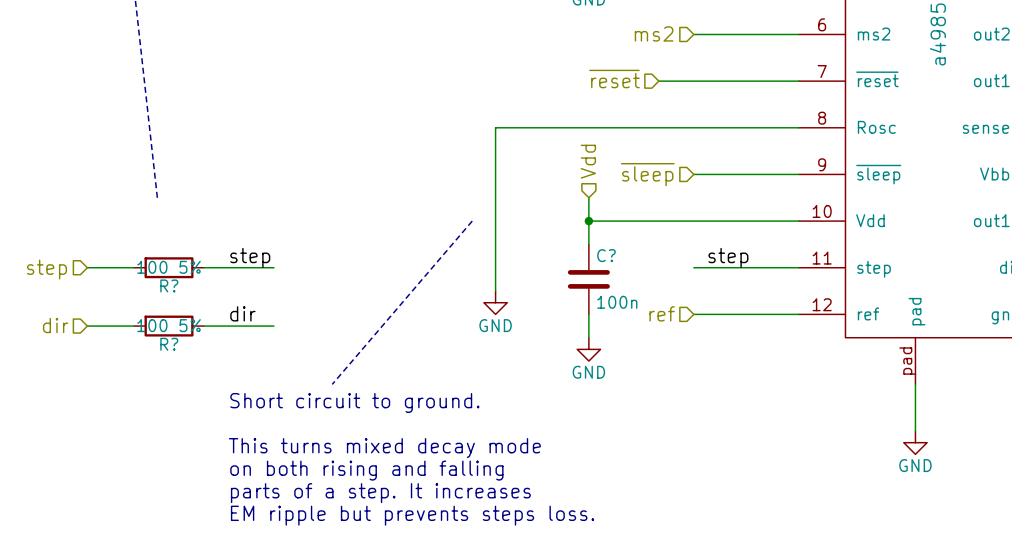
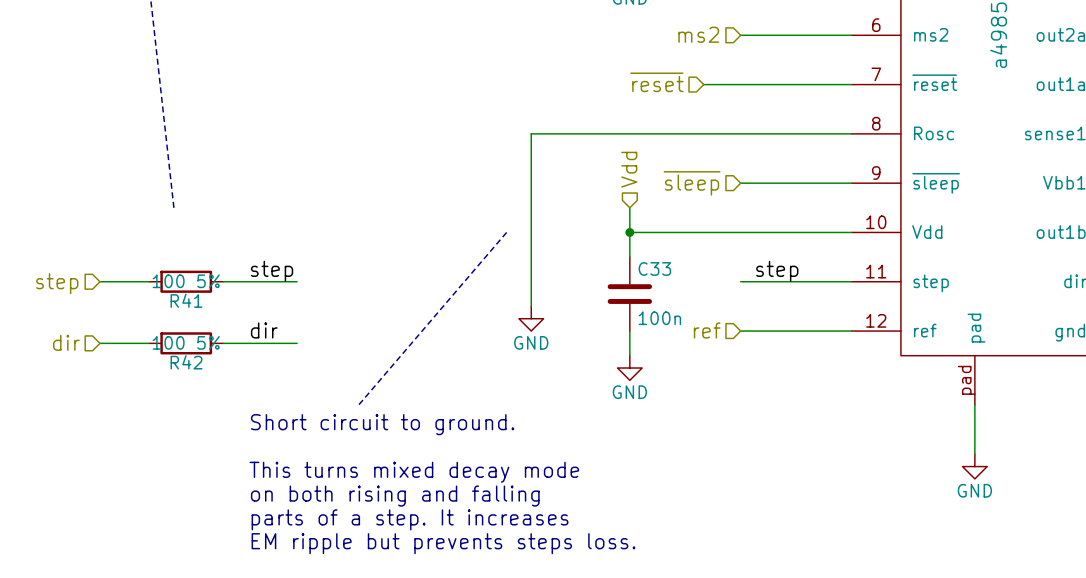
C? name: C? (606, 255) -> C33 (654, 268)
R? name: R? (169, 285) -> R41 (186, 300)
R? name: R? (169, 344) -> R42 (186, 362)

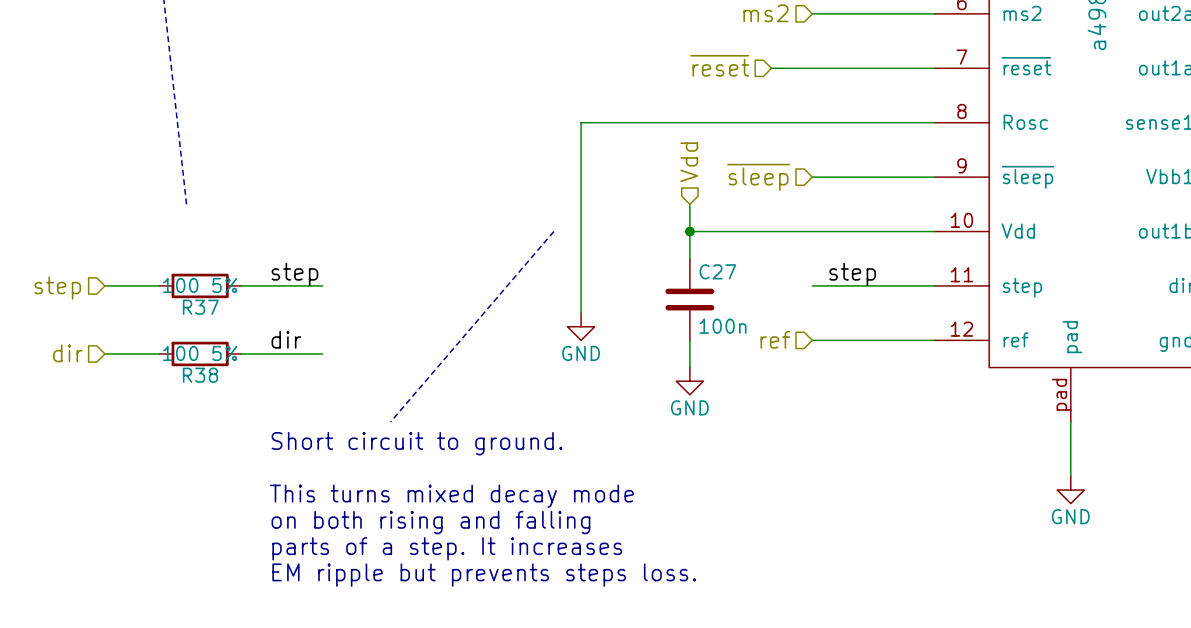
C33 name: C33 (654, 268) -> C27 (717, 271)
R41 name: R41 (186, 300) -> R37 (200, 307)
R42 name: R42 (186, 362) -> R38 (200, 375)

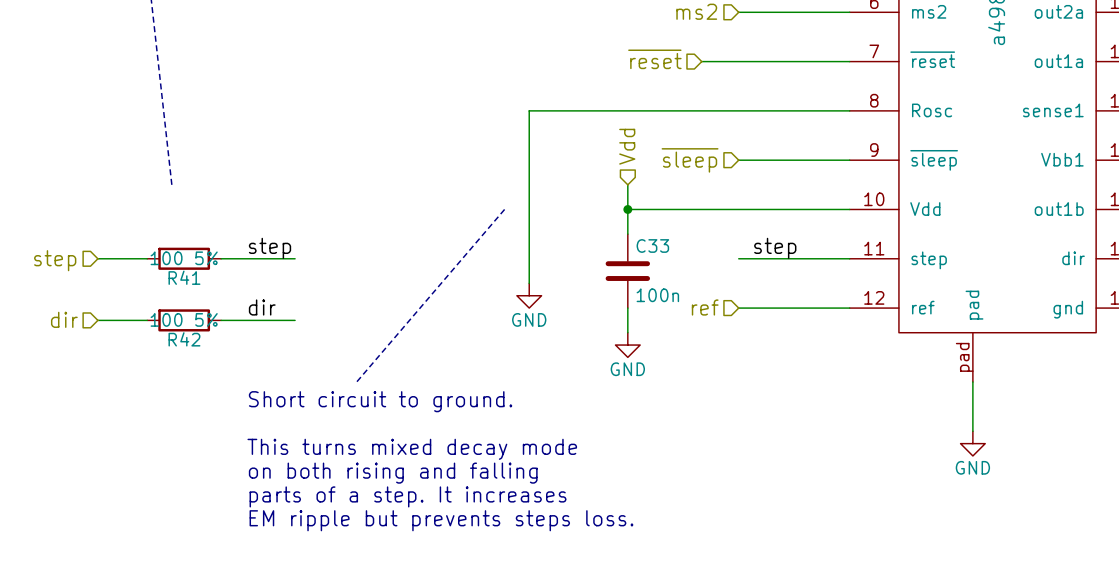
C27 name: C27 (717, 271) -> C33 (652, 245)
R37 name: R37 (200, 307) -> R41 (184, 277)
R38 name: R38 (200, 375) -> R42 (184, 339)

